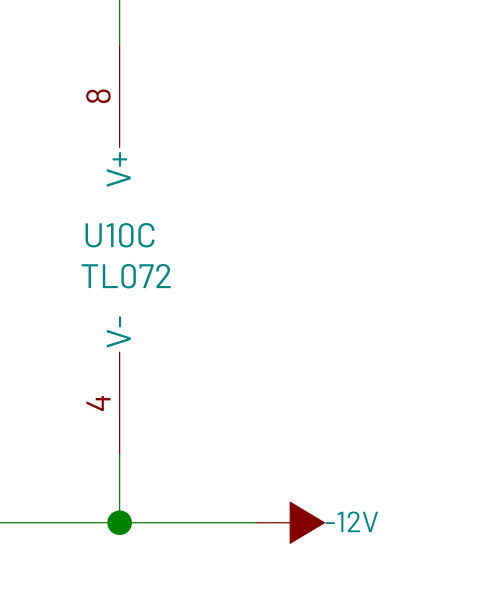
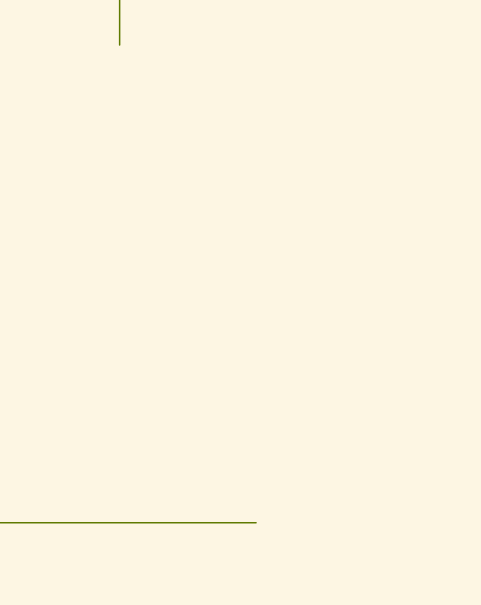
U10C: TL072 (119, 249) -> none
wire: (119, 454) (119, 522) -> none
junction: (119, 522) -> none
power symbol: -12V (290, 522) -> none

